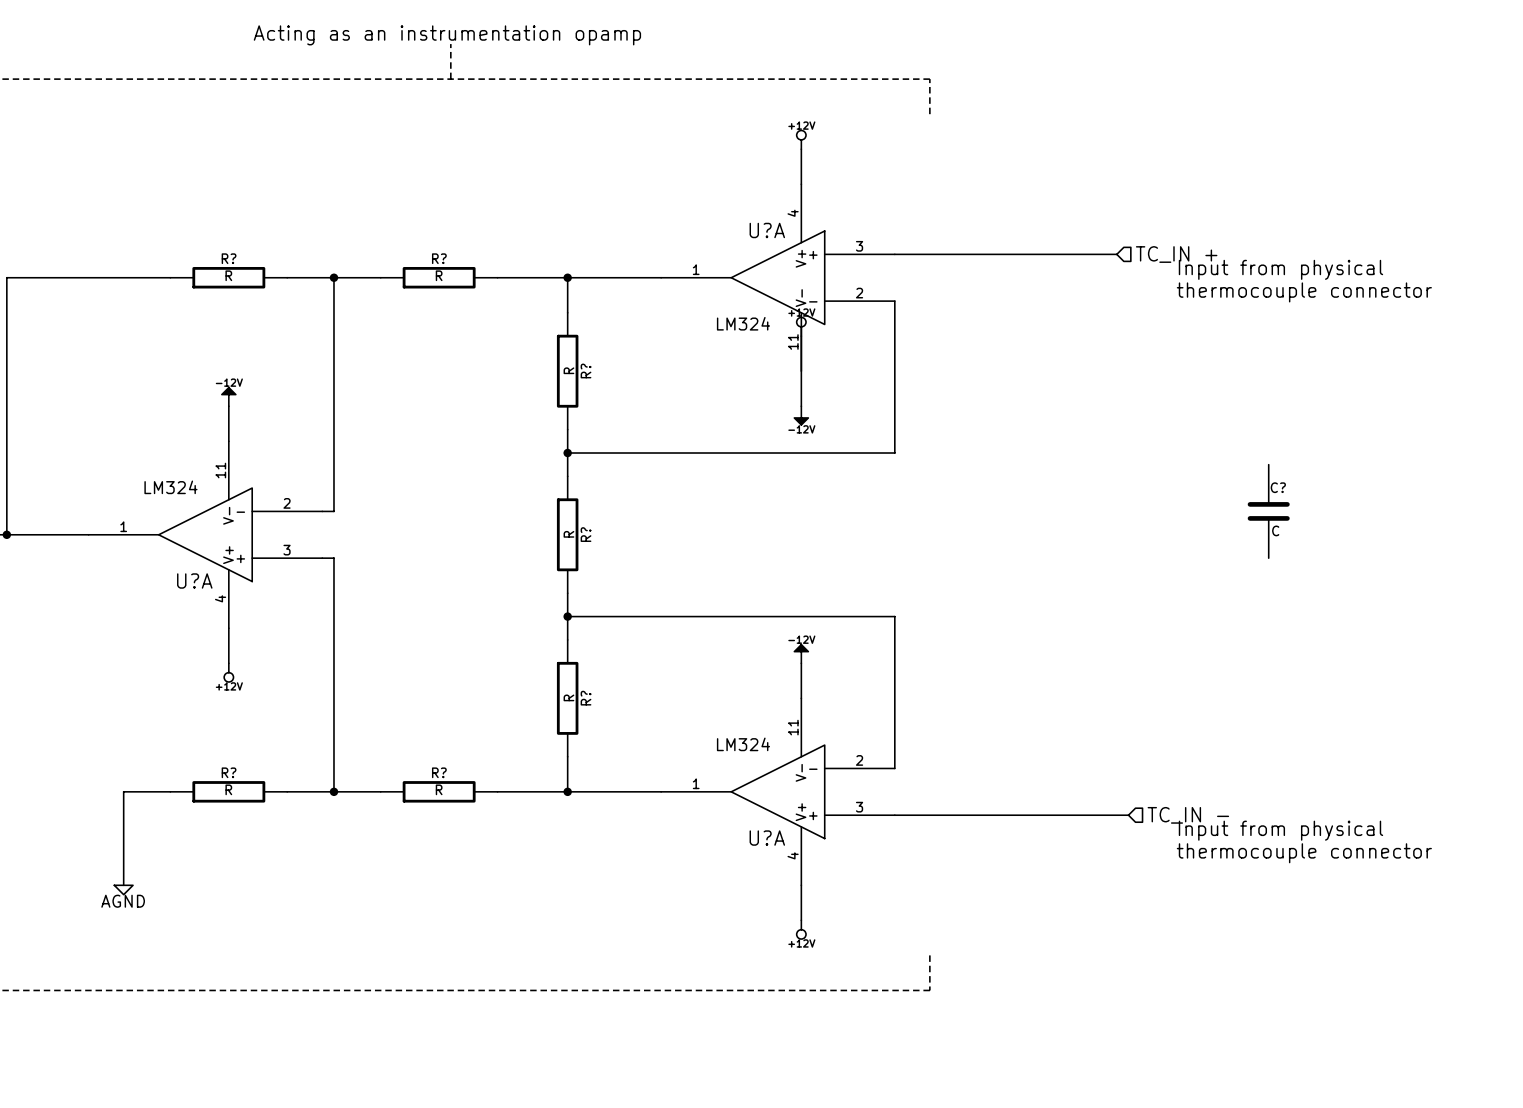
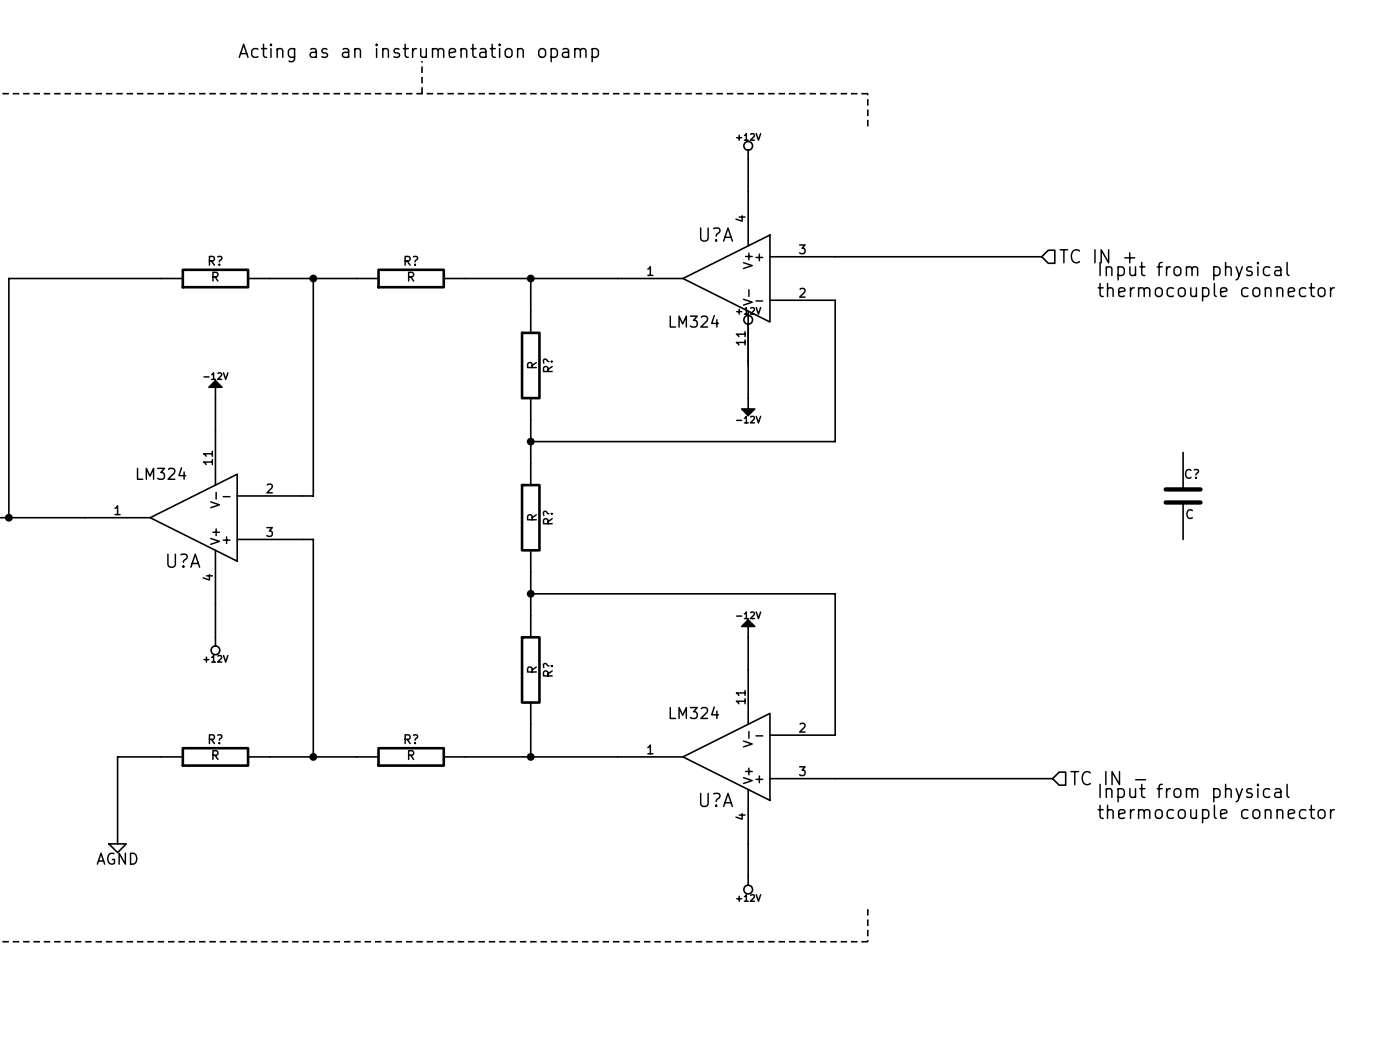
hierarchical label: TC_IN + (1176, 254) -> TC IN + (1097, 256)
hierarchical label: TC_IN - (1188, 815) -> TC IN - (1108, 778)

